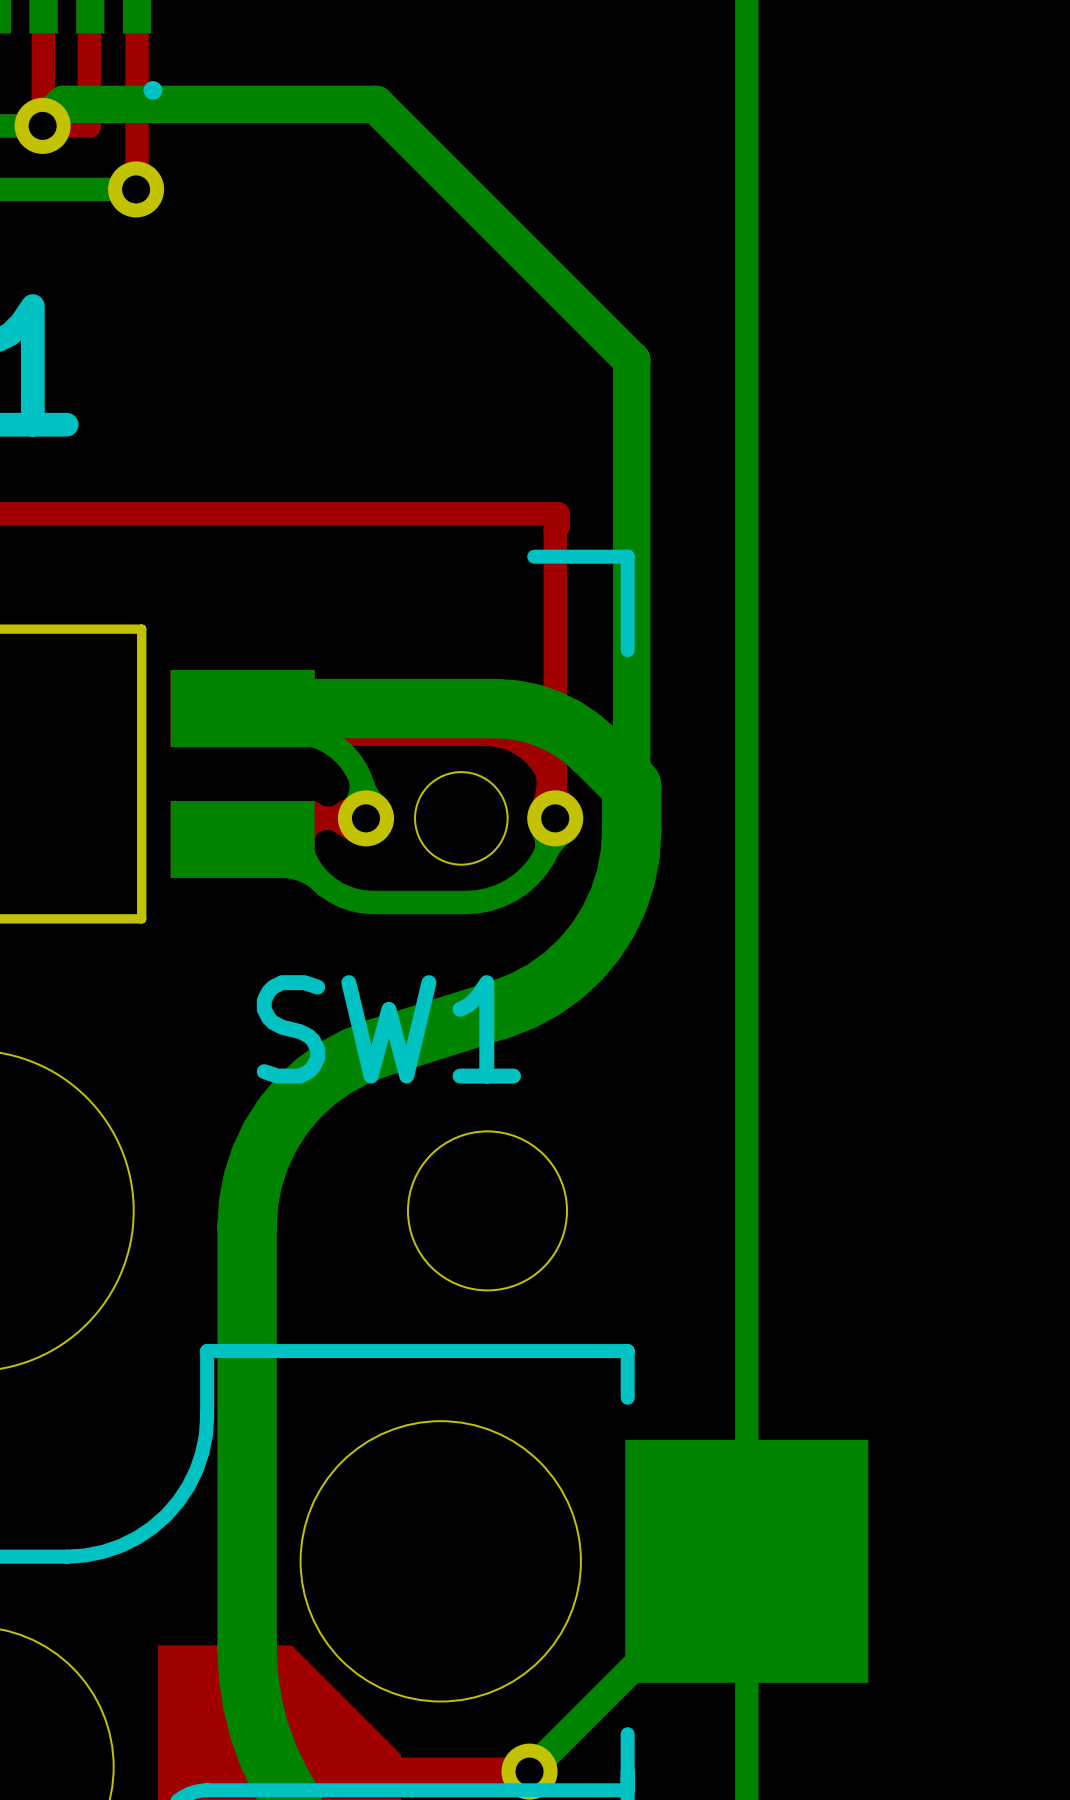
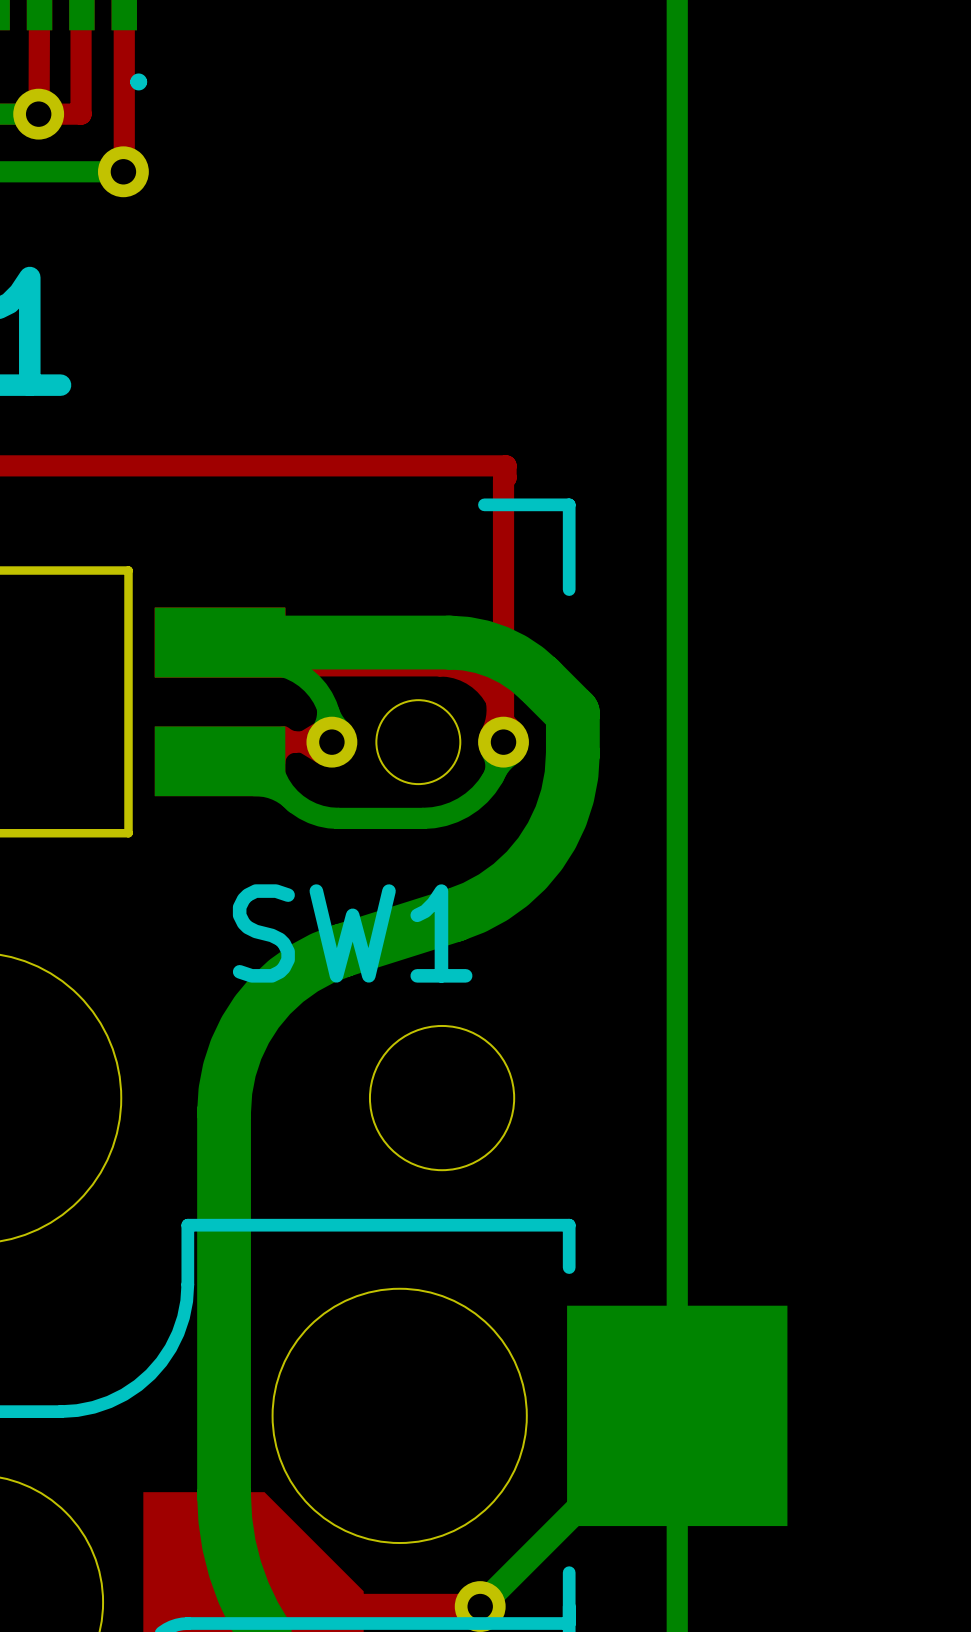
bottom track: (42, 125) (63, 104) (375, 104) (631, 360) (631, 786) -> none

